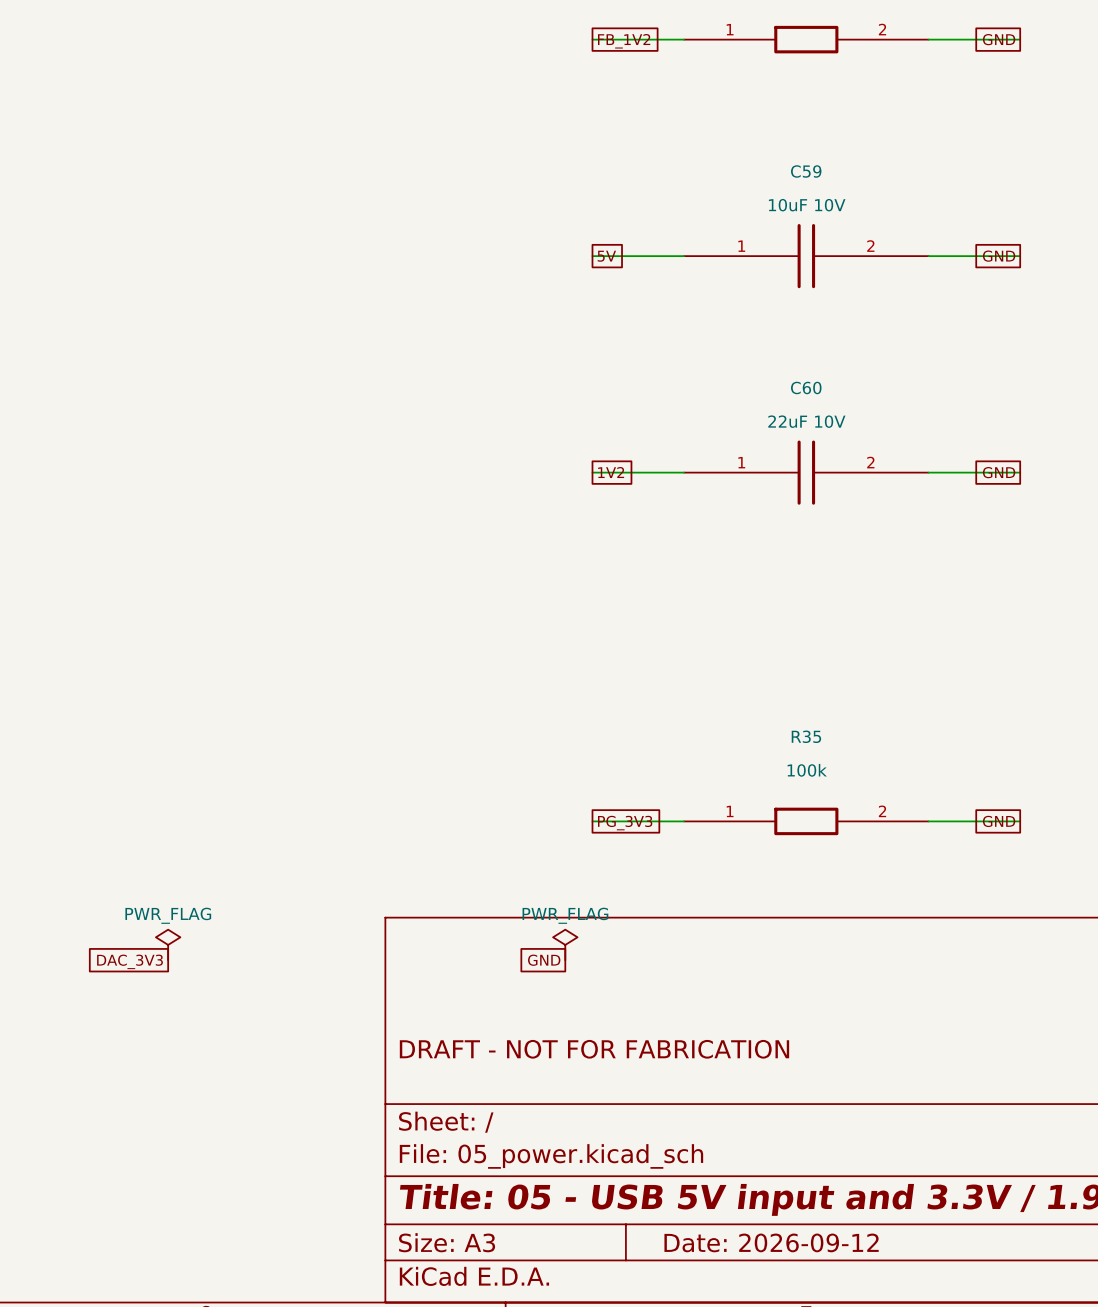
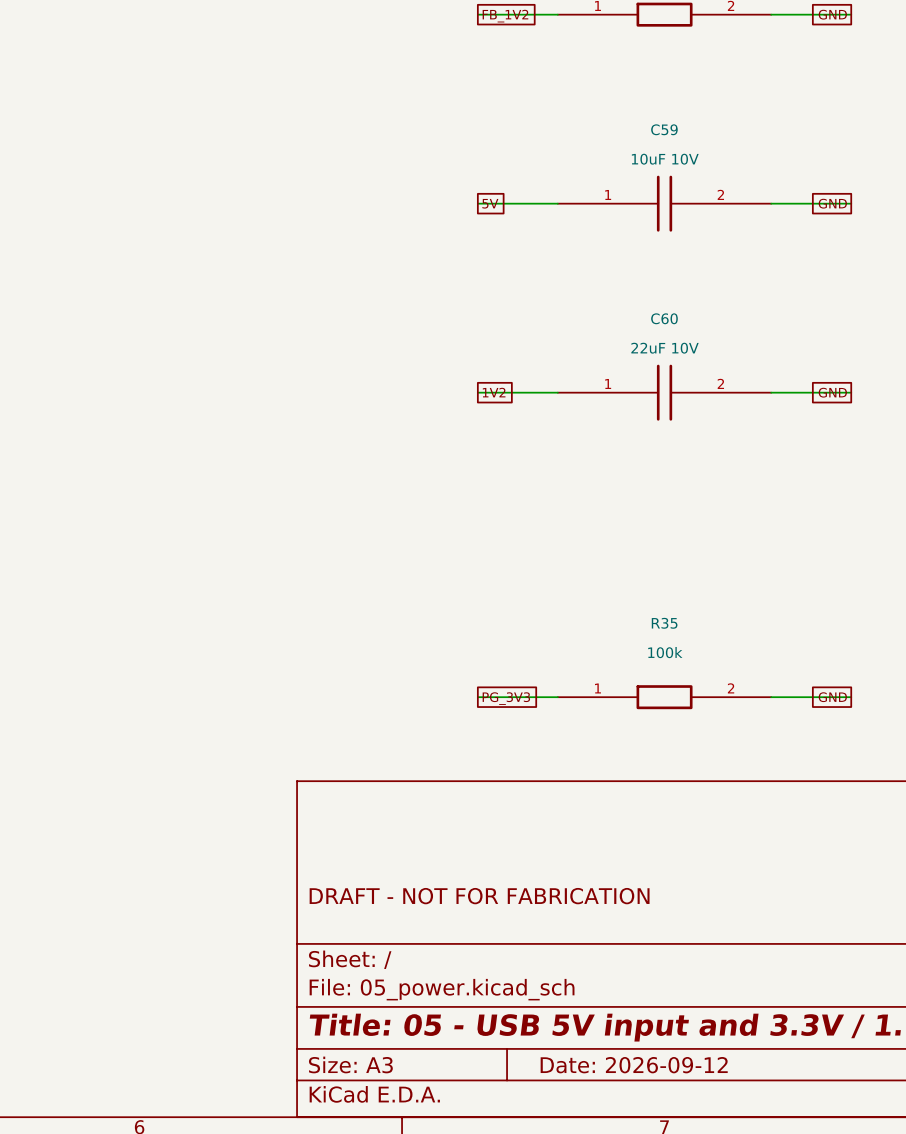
power symbol: PWR_FLAG (168, 944) -> none
power symbol: PWR_FLAG (565, 944) -> none
global label: GND (544, 960) -> none
global label: DAC_3V3 (130, 961) -> none

